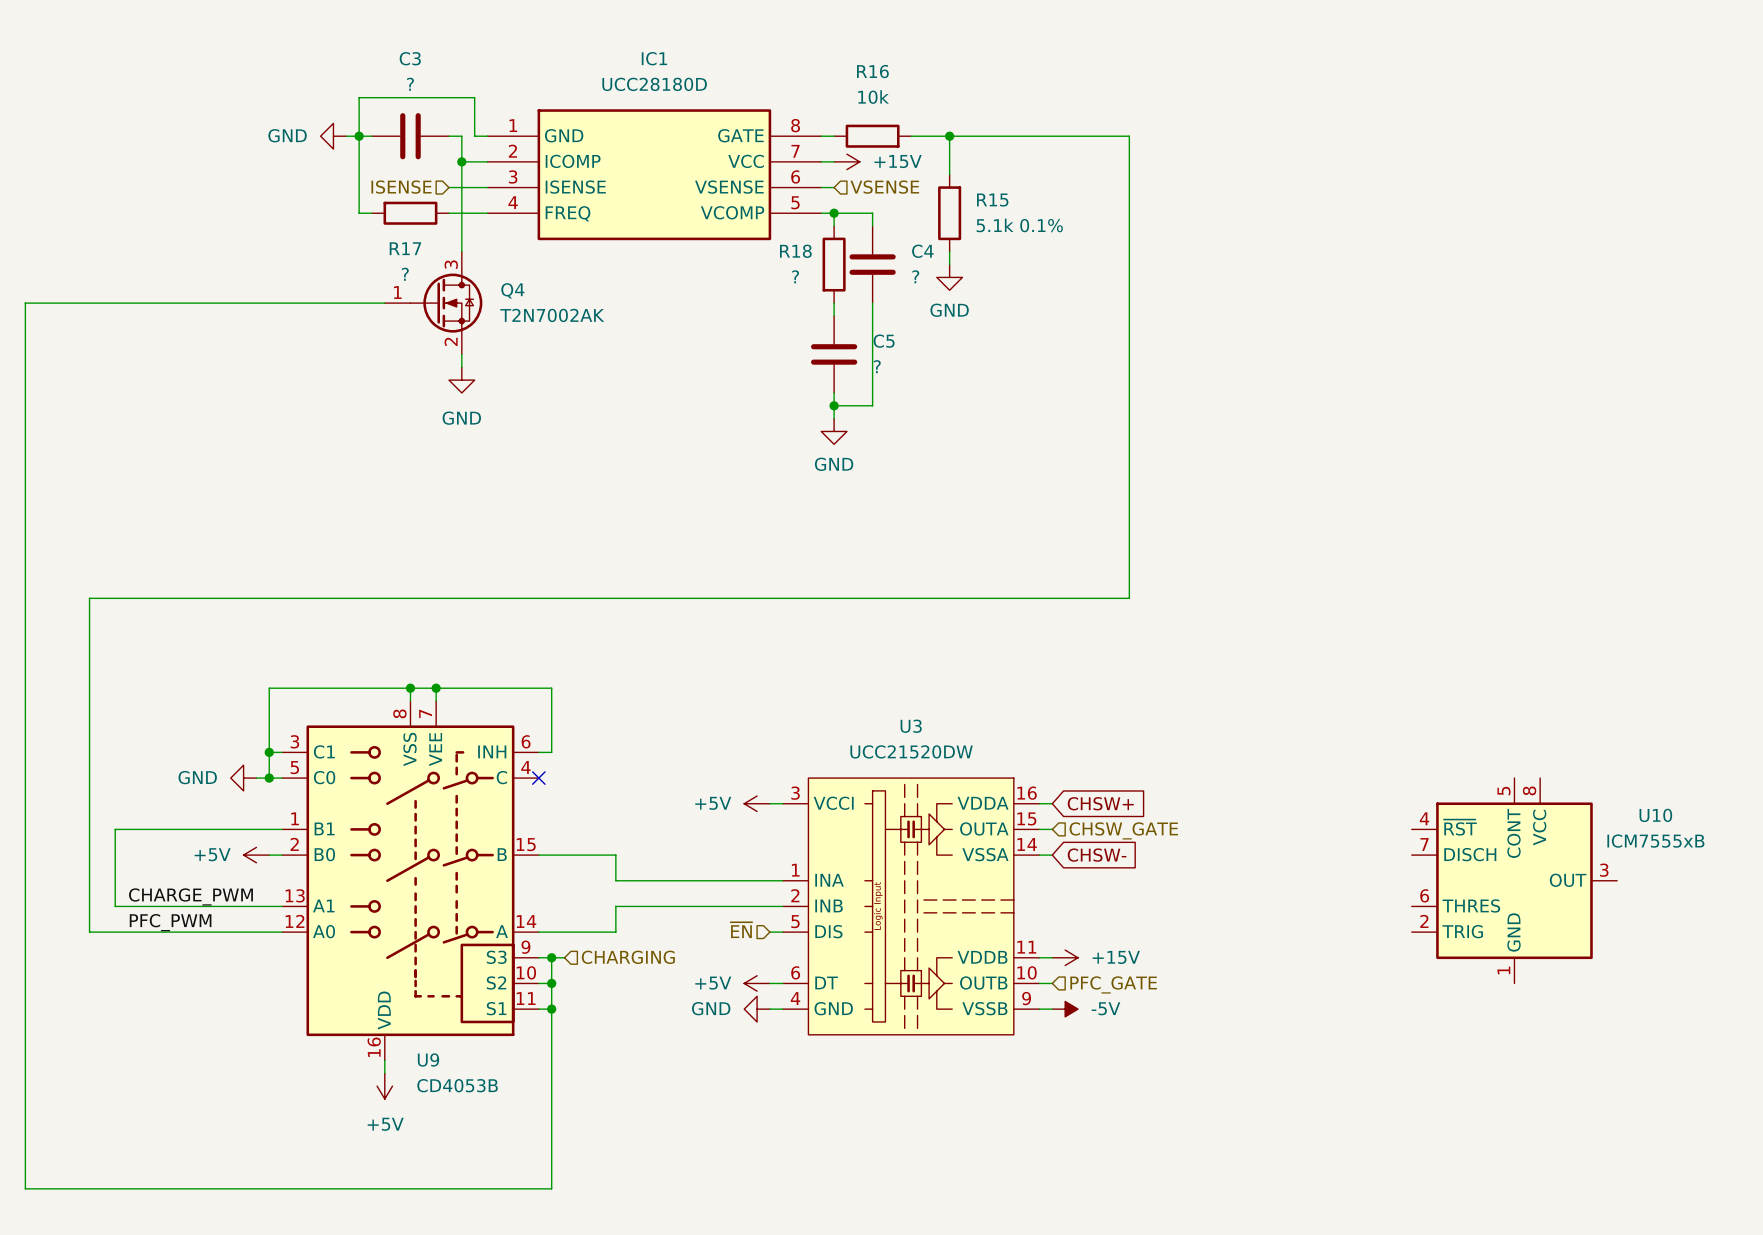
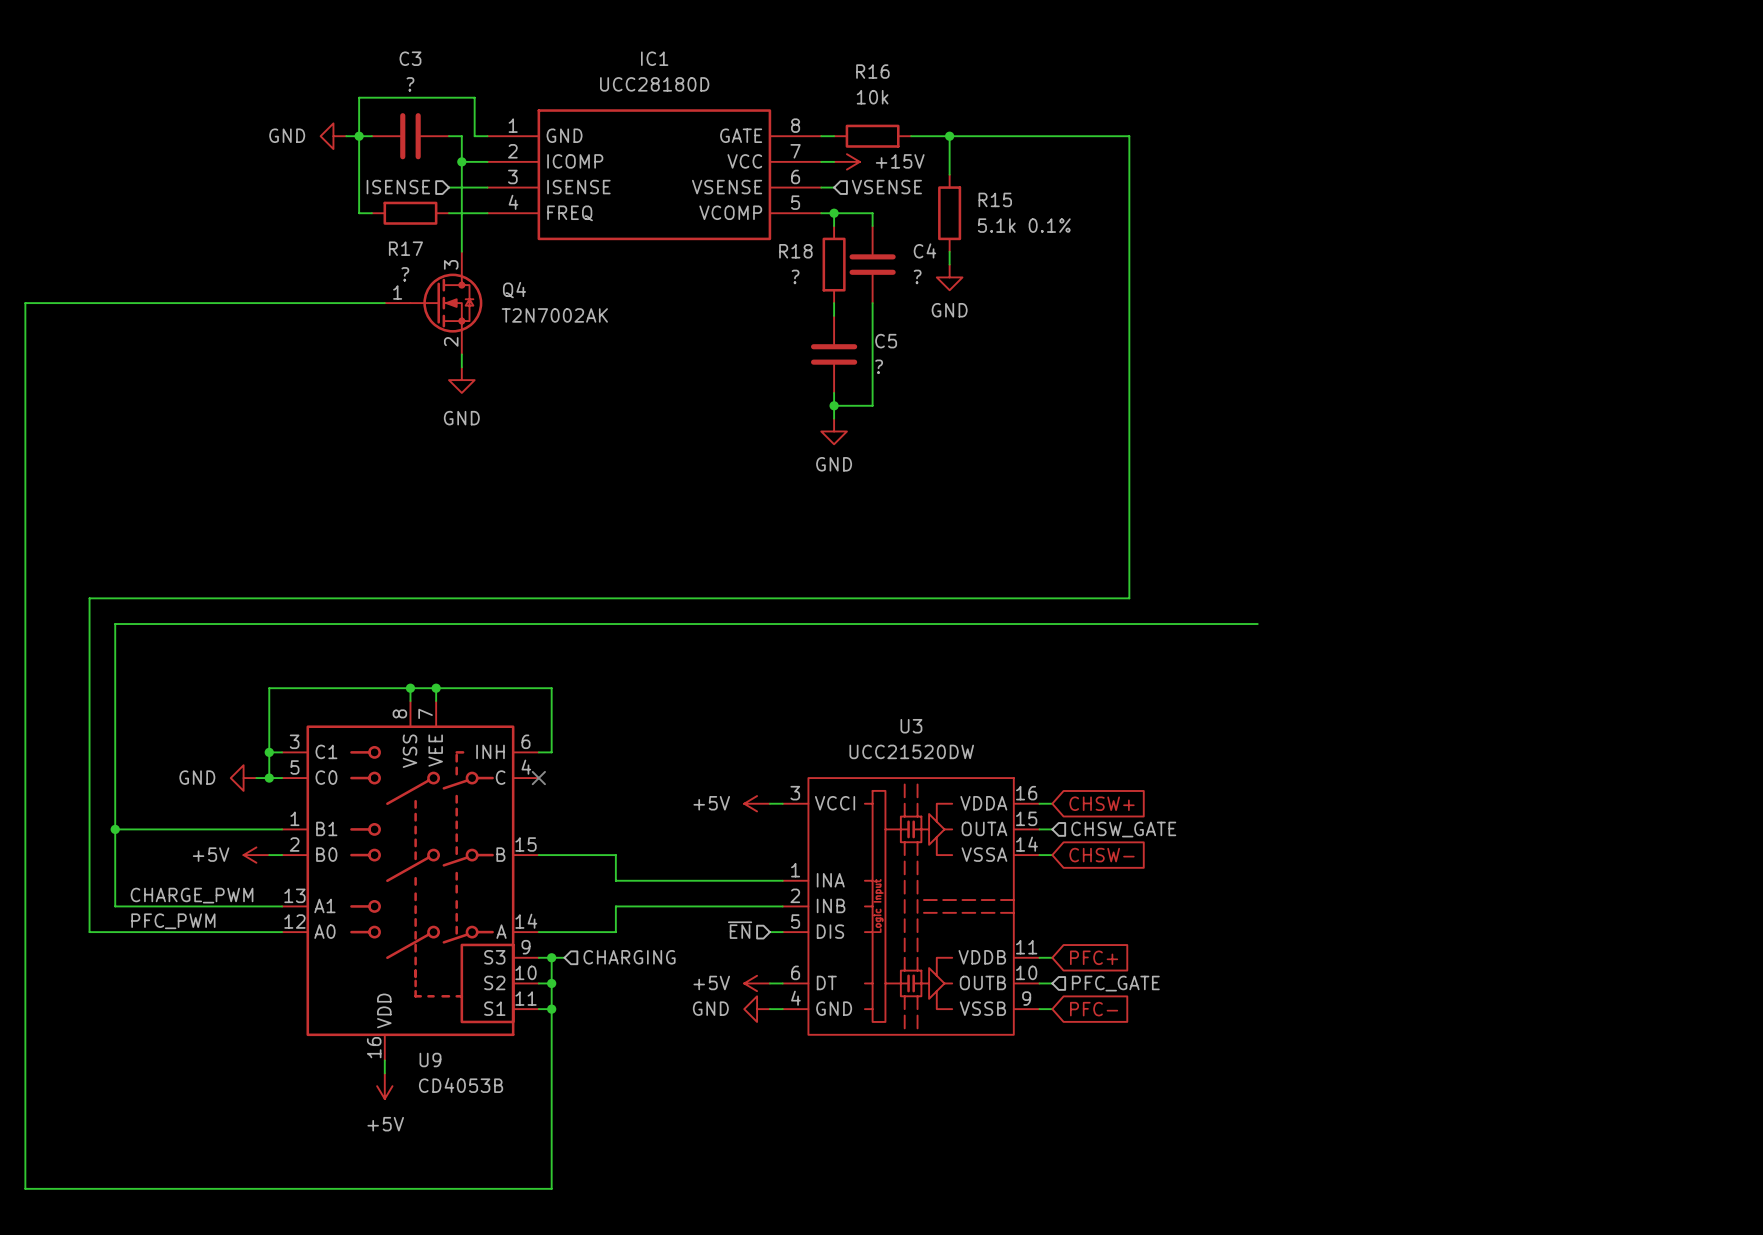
wire: none -> (1257, 624) (115, 624) (115, 829)
junction: none -> (115, 829)
U10: ICM7555xB (1514, 880) -> none
power symbol: +15V (1065, 957) -> none
global label: none -> PFC+ (1094, 957)
power symbol: -5V (1065, 1009) -> none
global label: none -> PFC- (1094, 1009)

